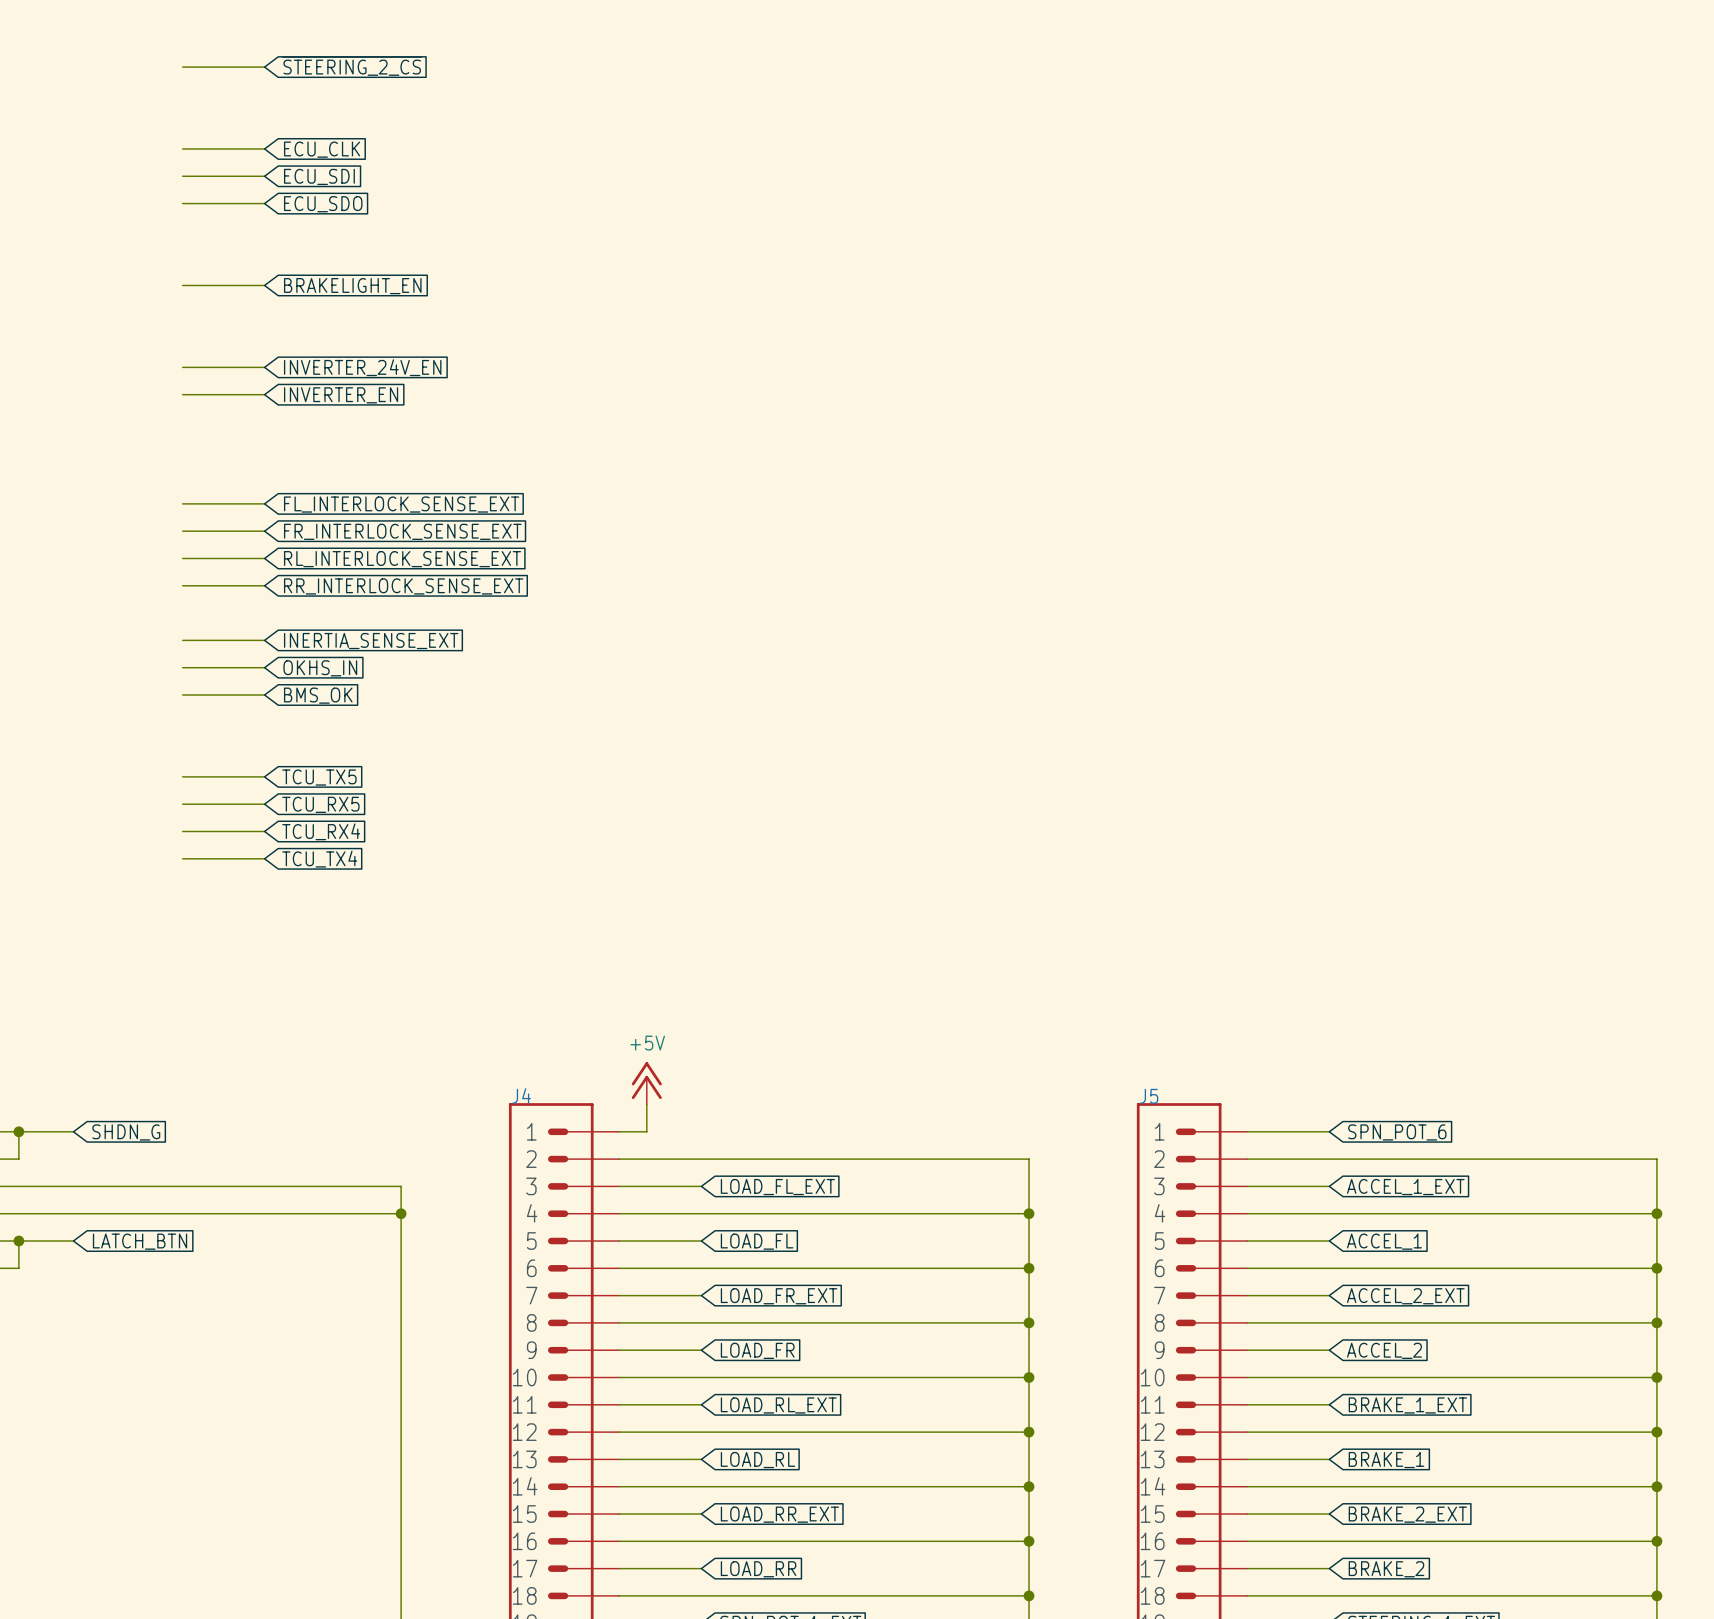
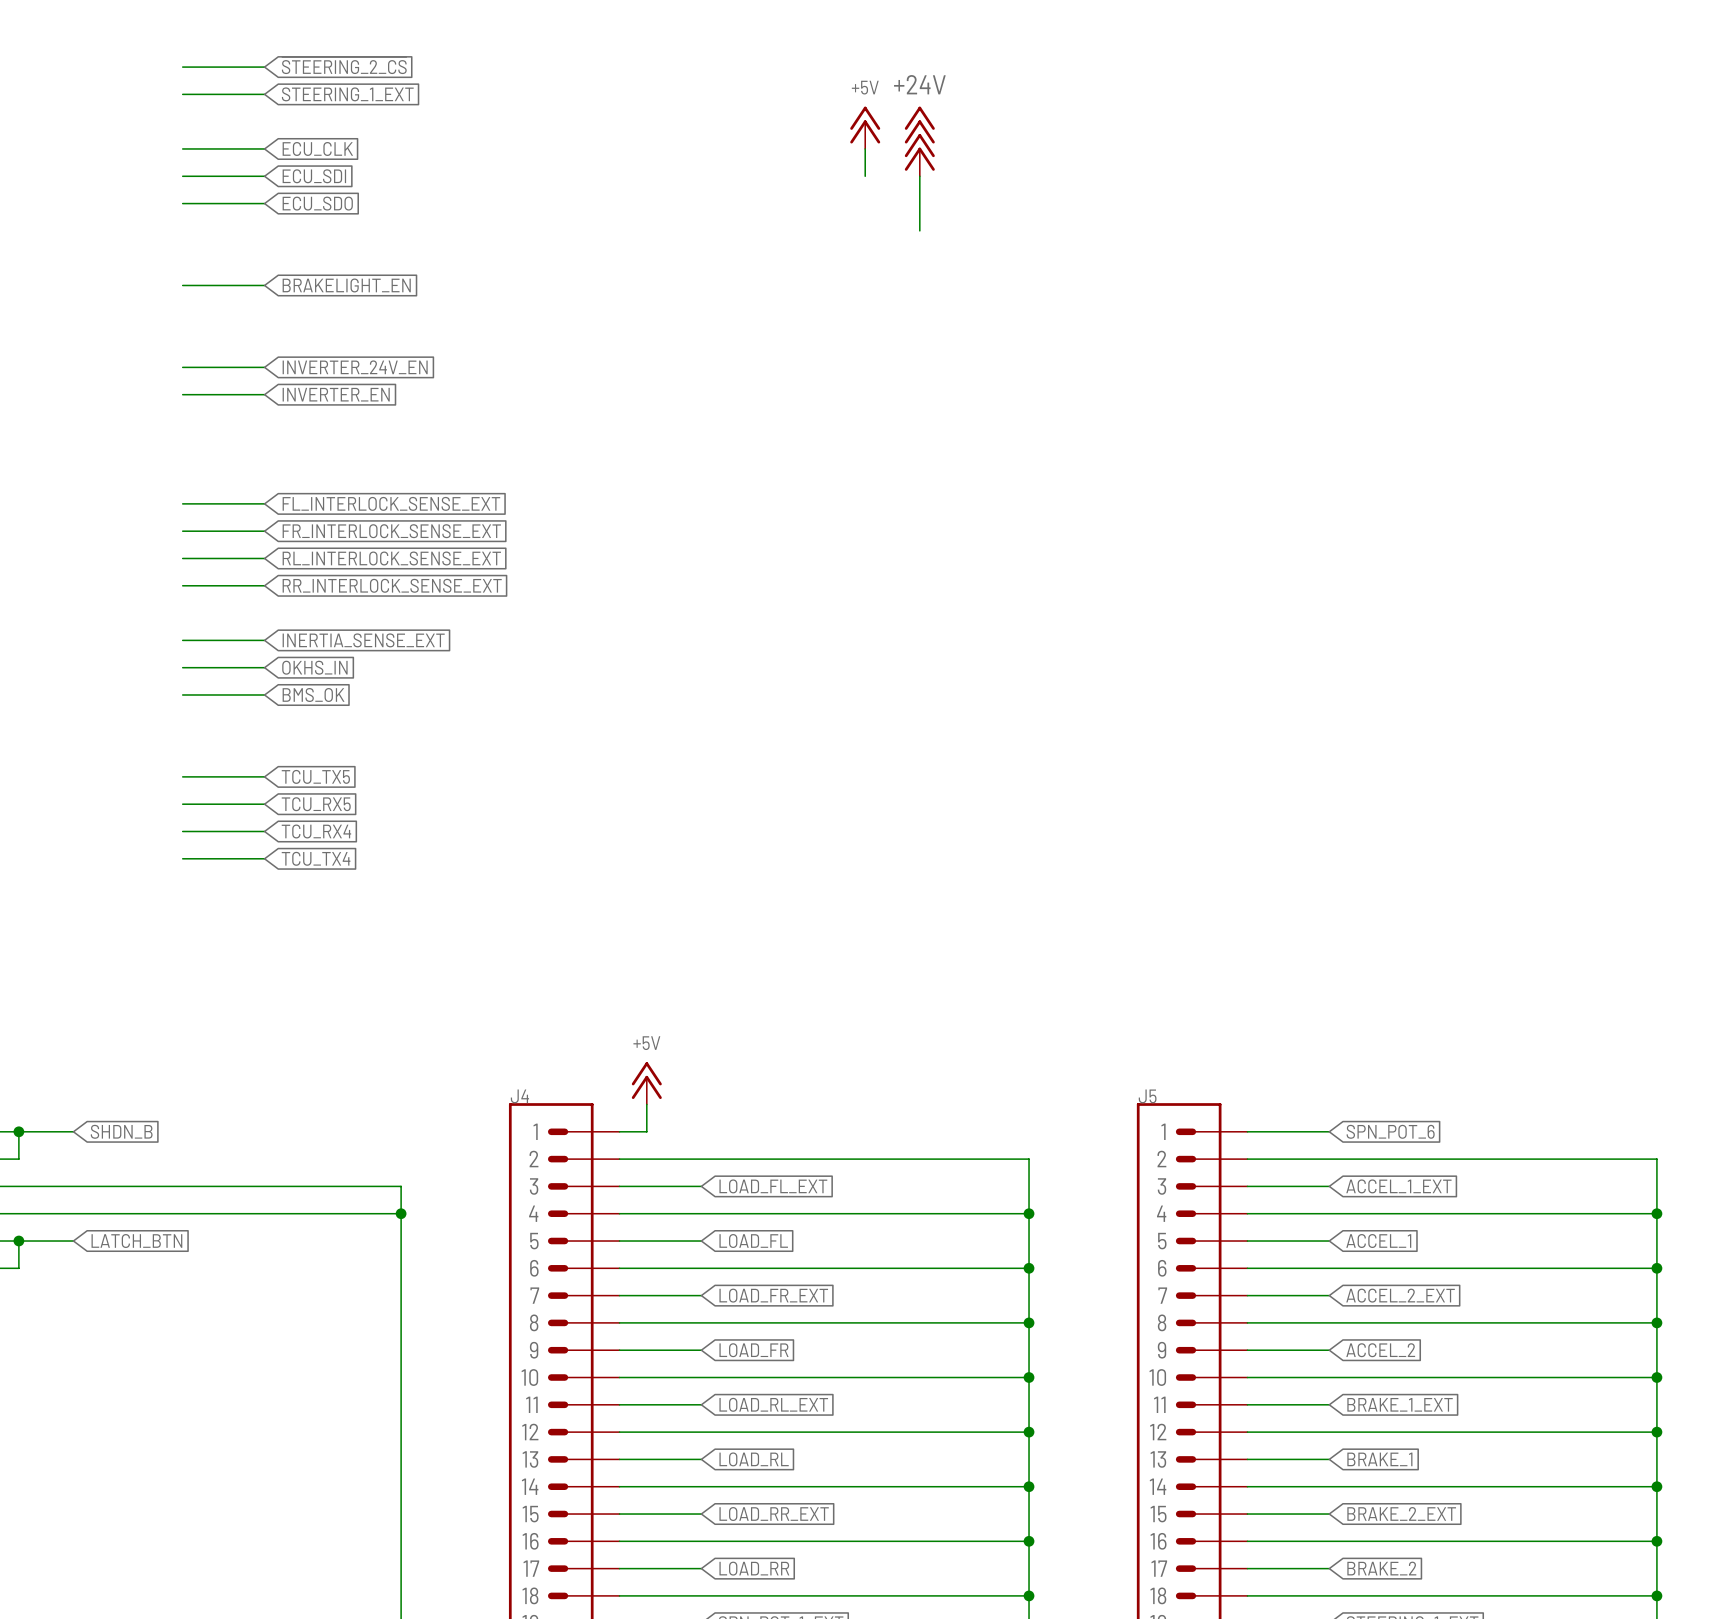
wire: none -> (182, 94) (264, 94)
global label: none -> STEERING_1_EXT (347, 94)
power symbol: none -> +5V (865, 127)
power symbol: none -> +24V (919, 141)
wire: none -> (865, 148) (865, 176)
wire: none -> (919, 176) (919, 230)
global label: SHDN_G (126, 1132) -> SHDN_B (121, 1131)

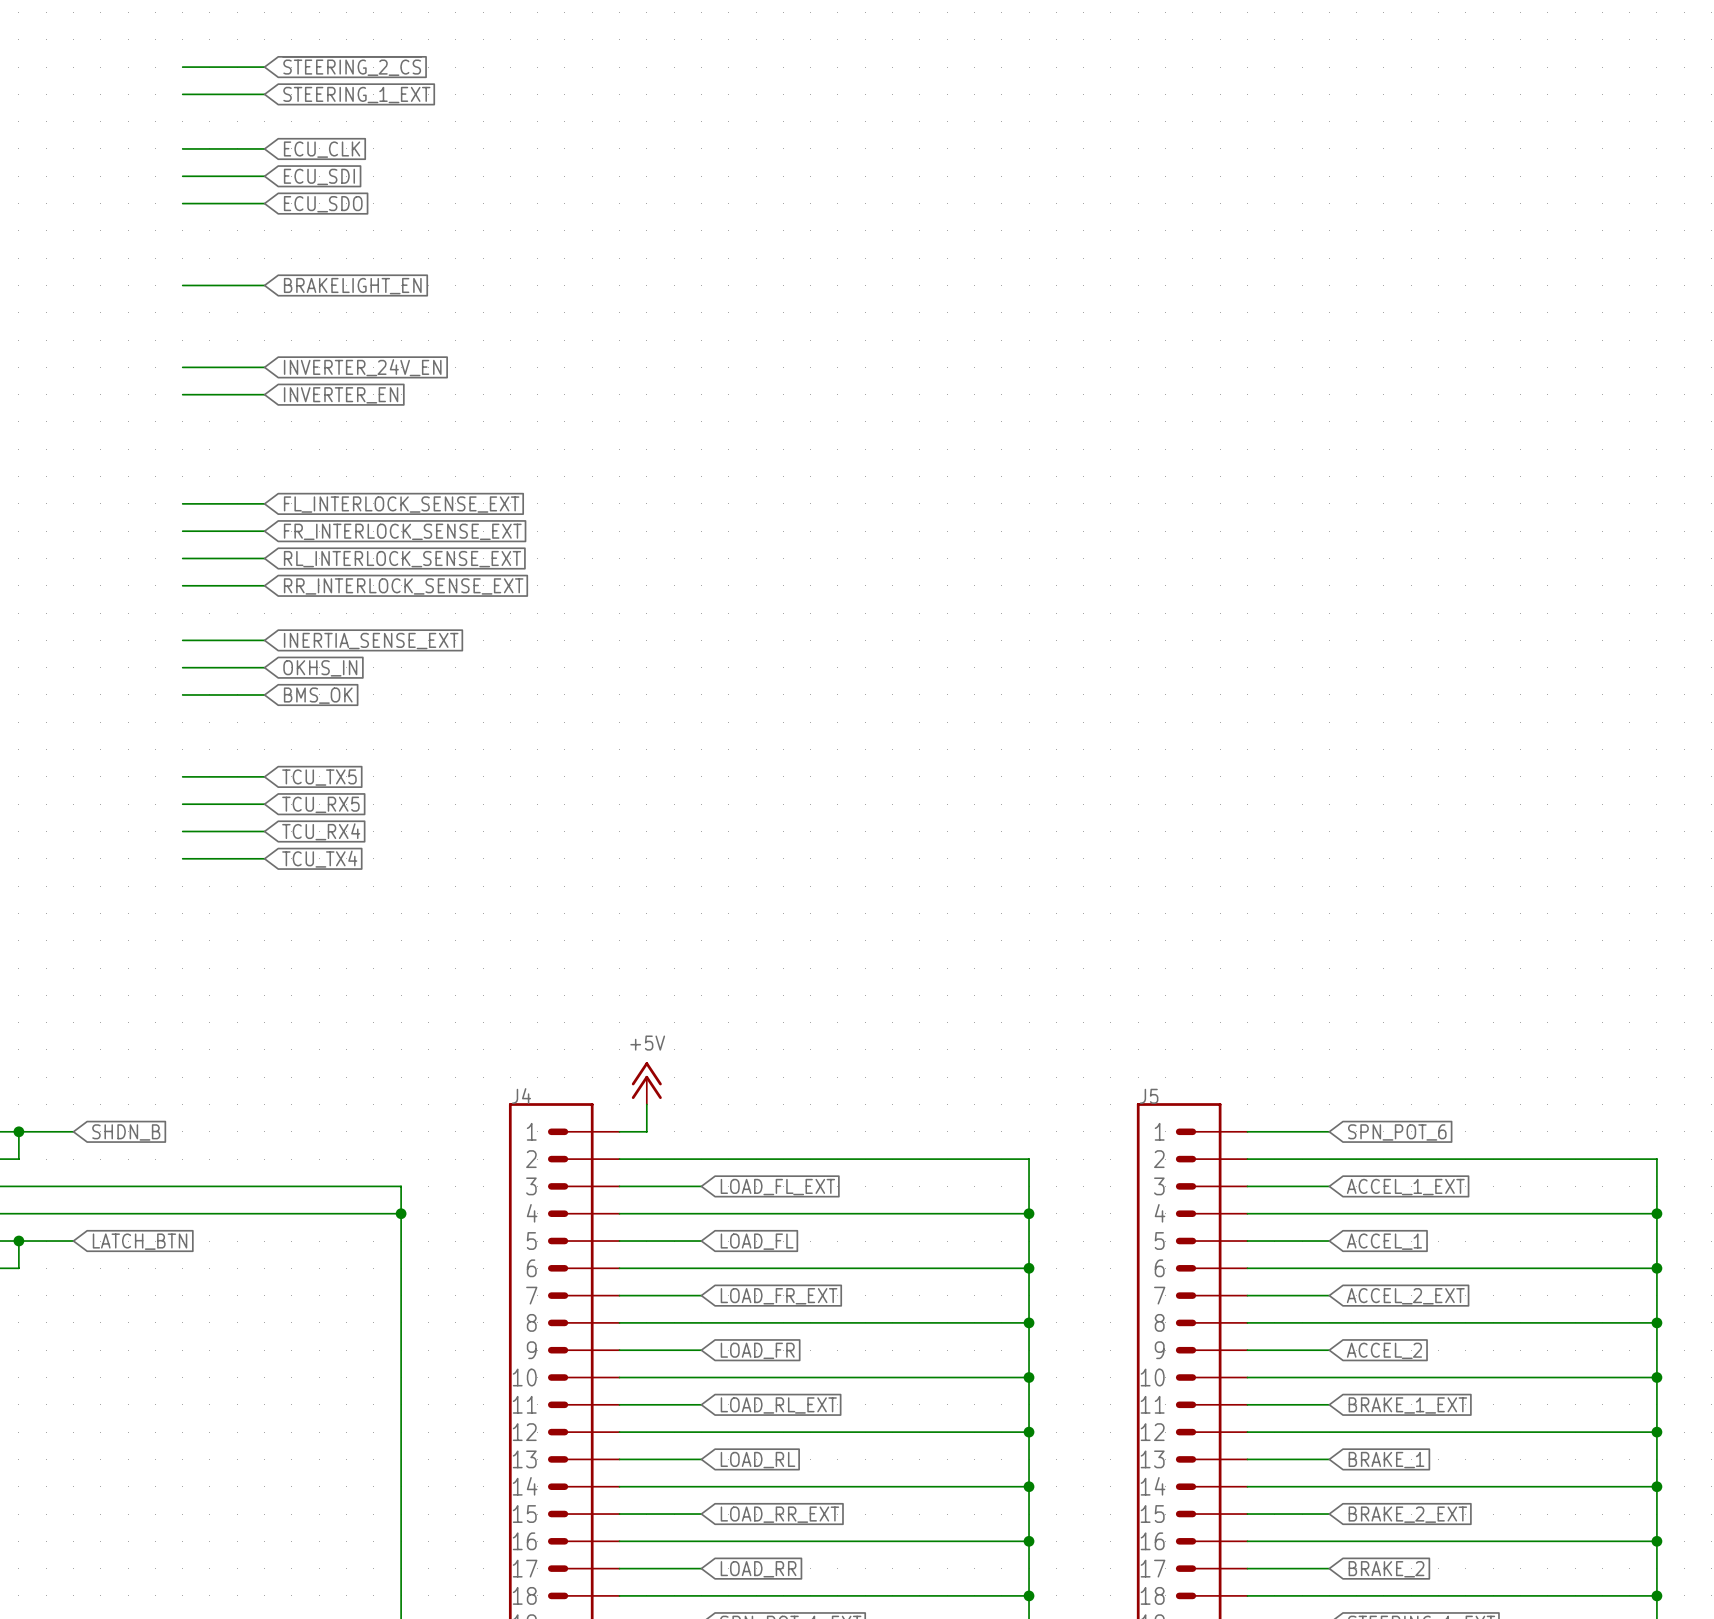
power symbol: +5V (865, 127) -> none
power symbol: +24V (919, 141) -> none
wire: (865, 148) (865, 176) -> none
wire: (919, 176) (919, 230) -> none

